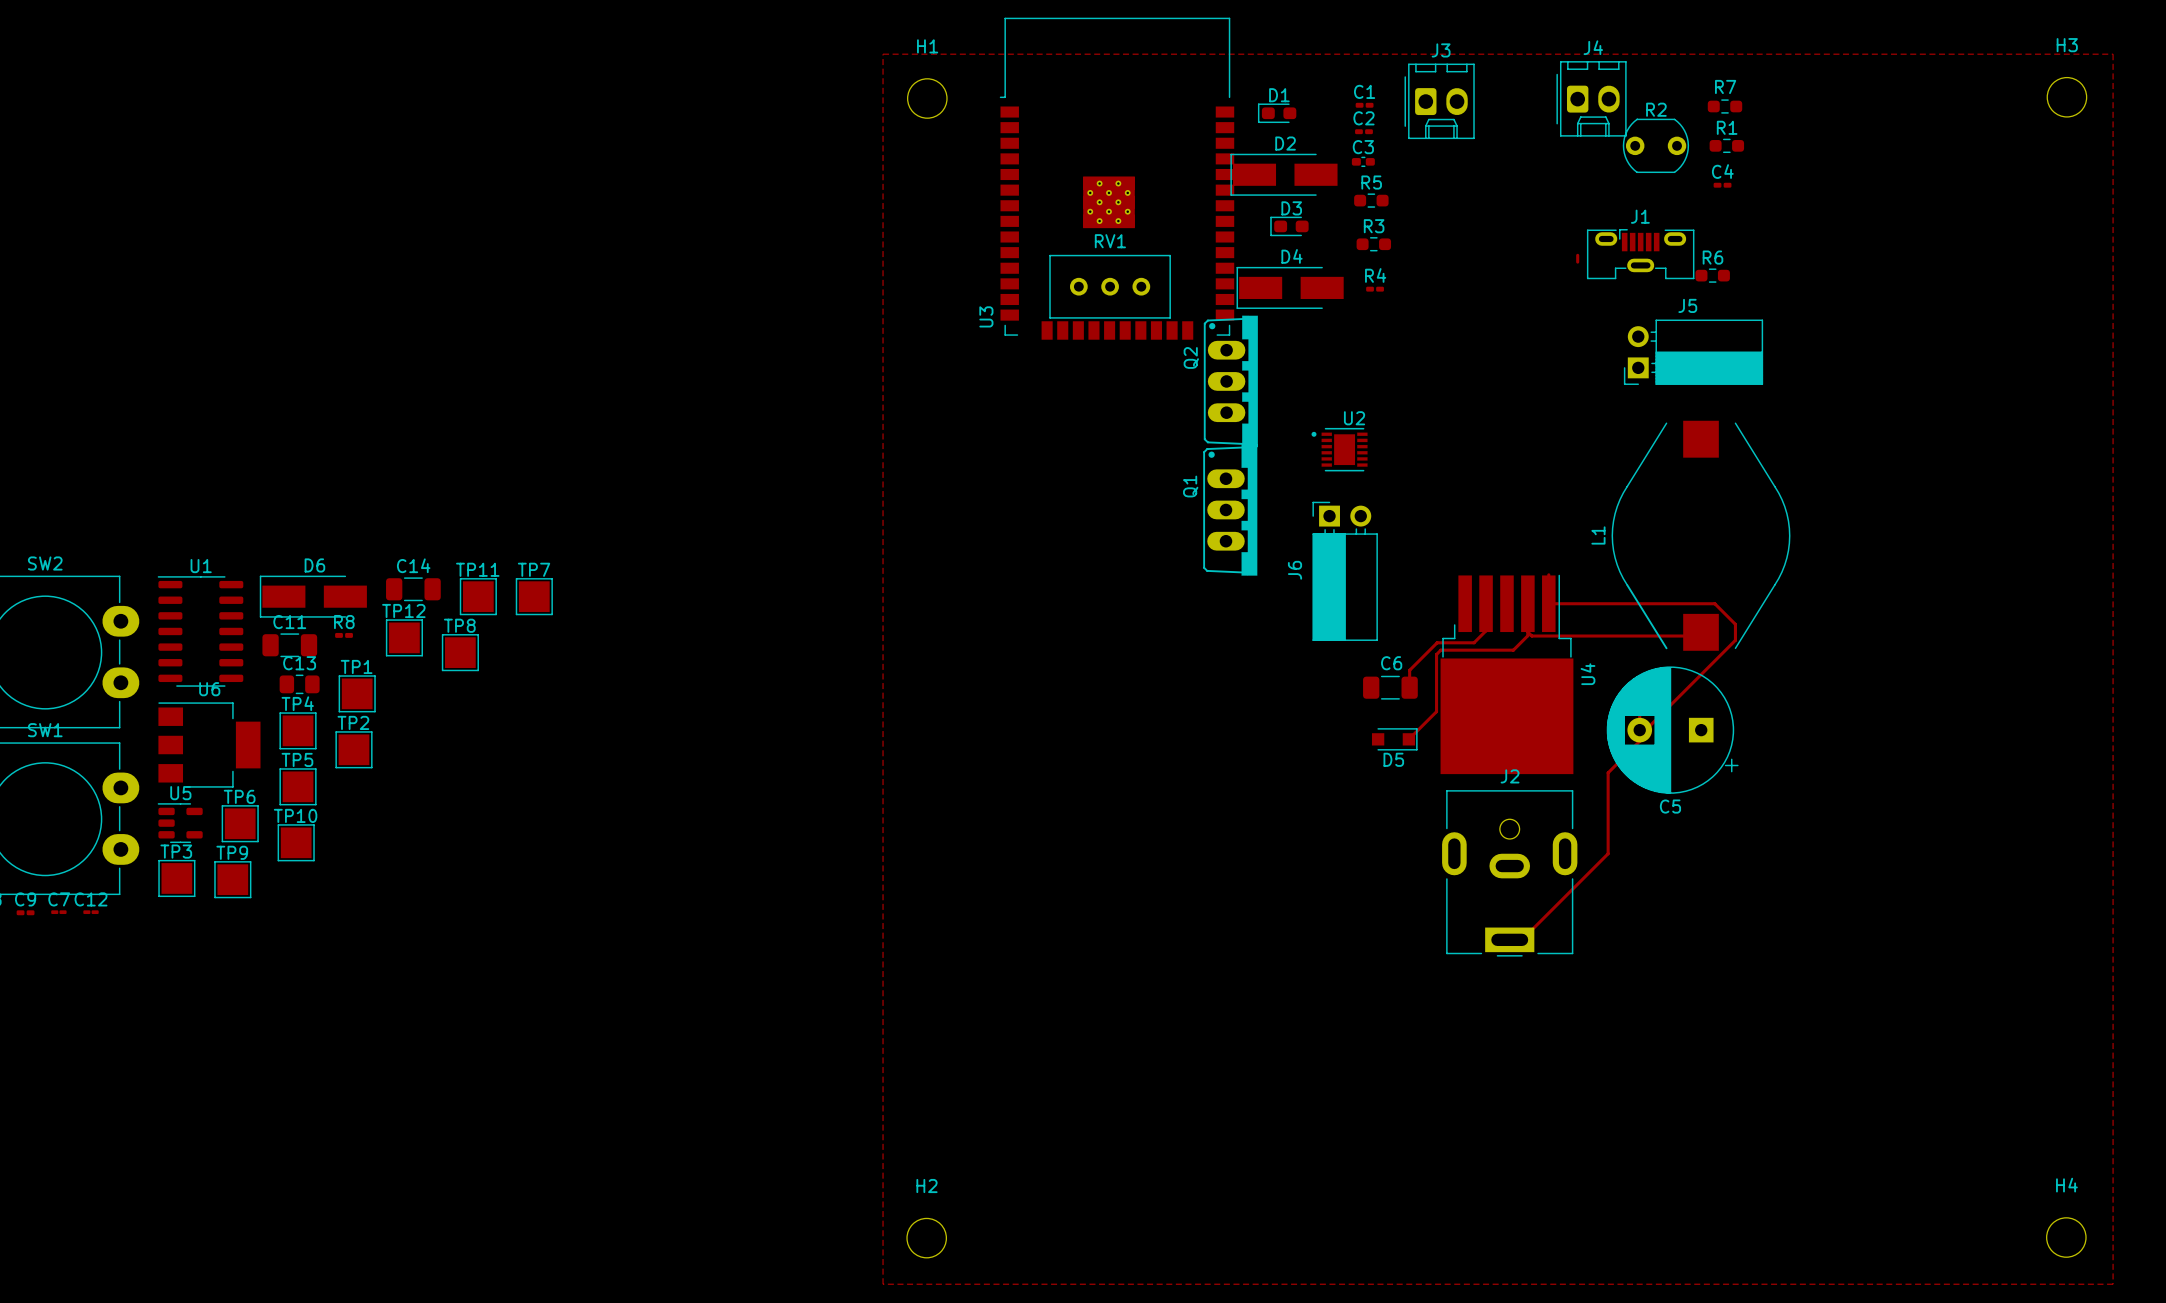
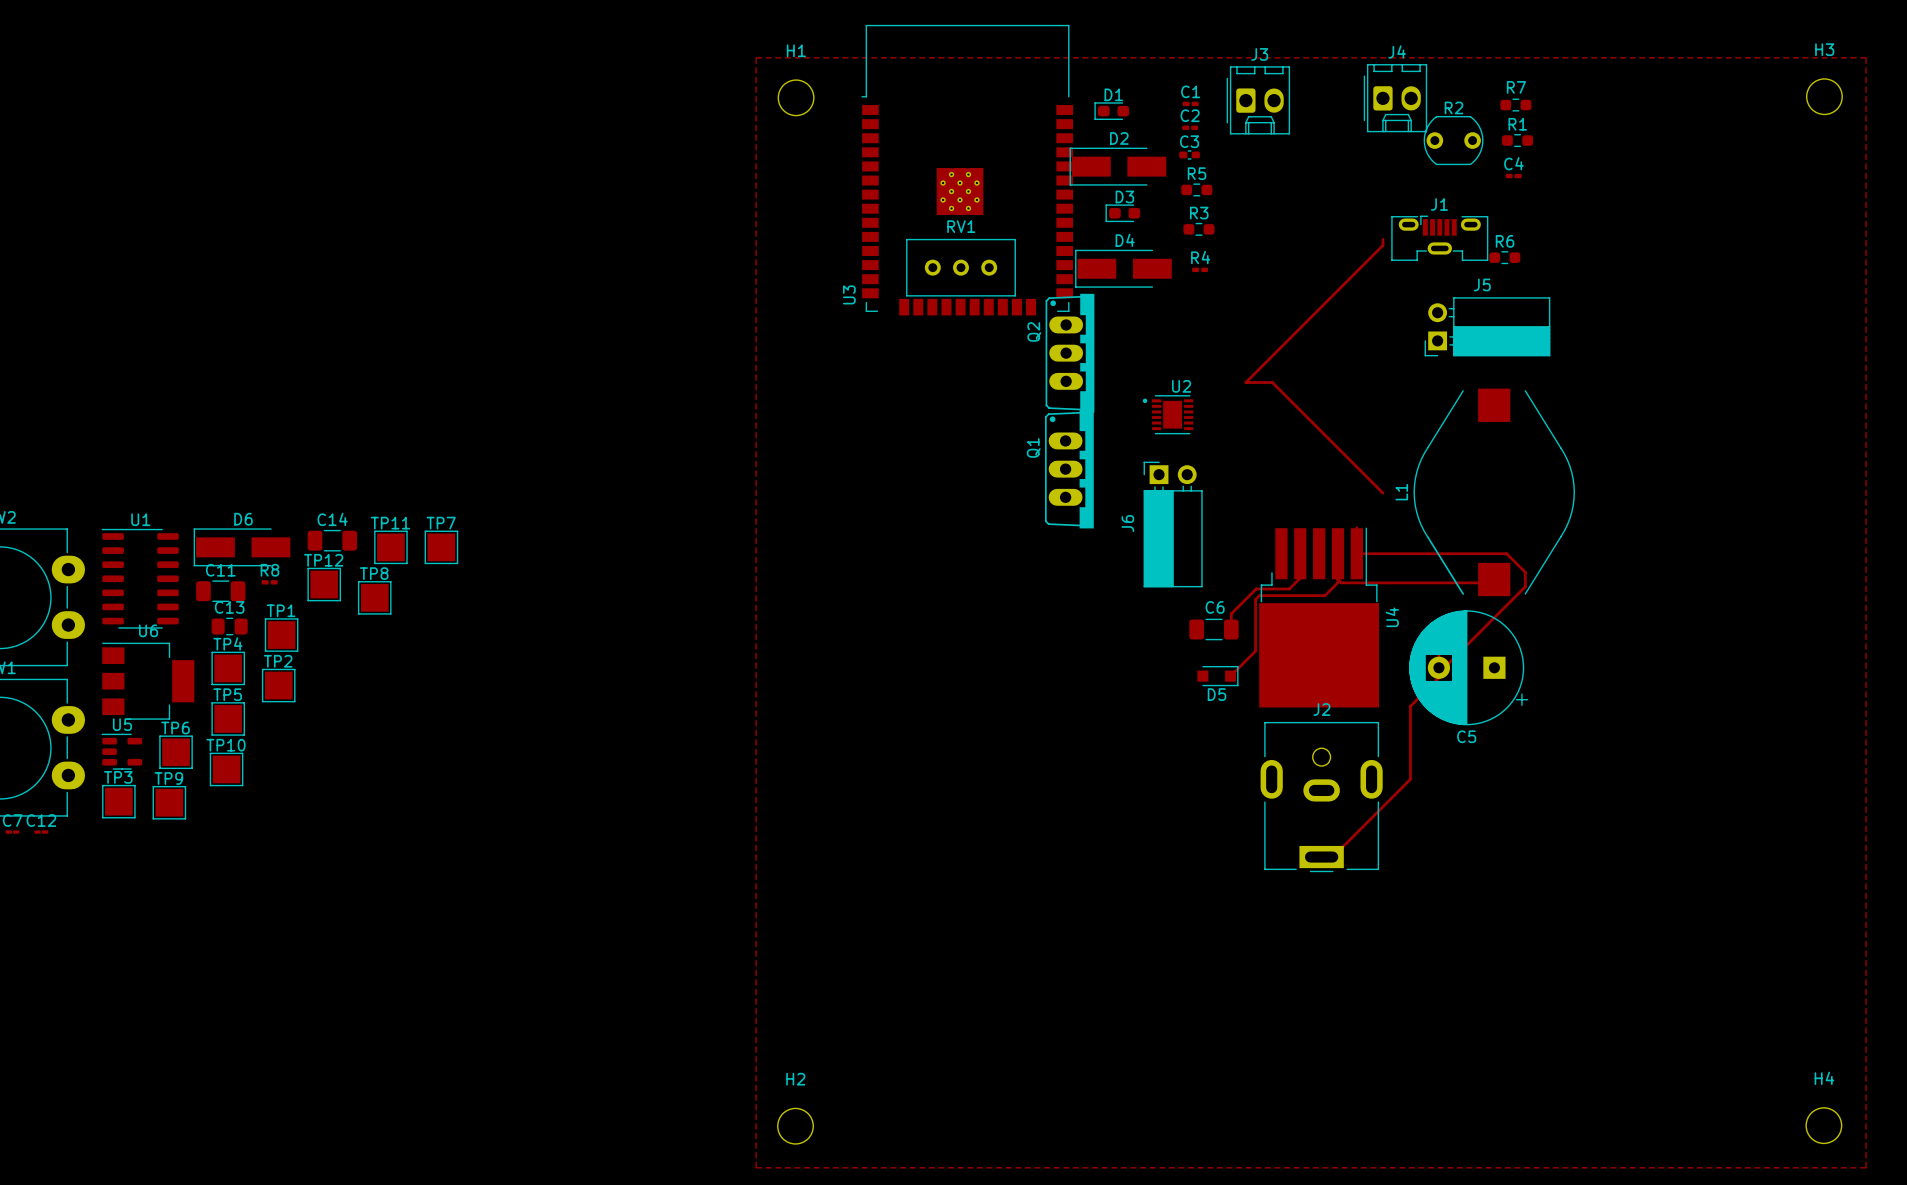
track: none -> (1382, 245) (1245, 382) (1272, 382) (1382, 493)

